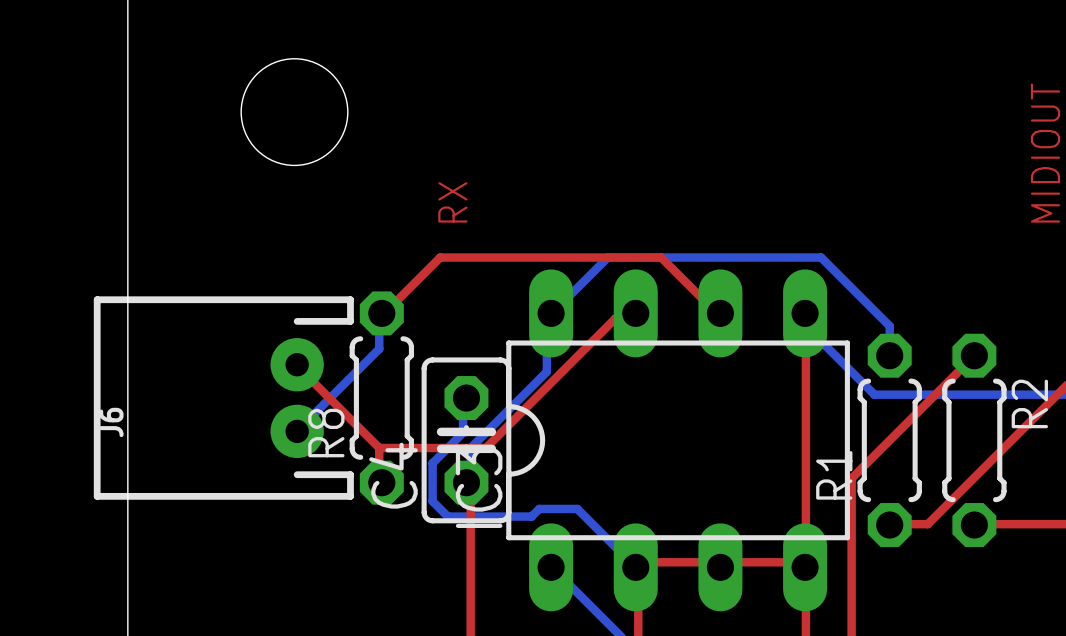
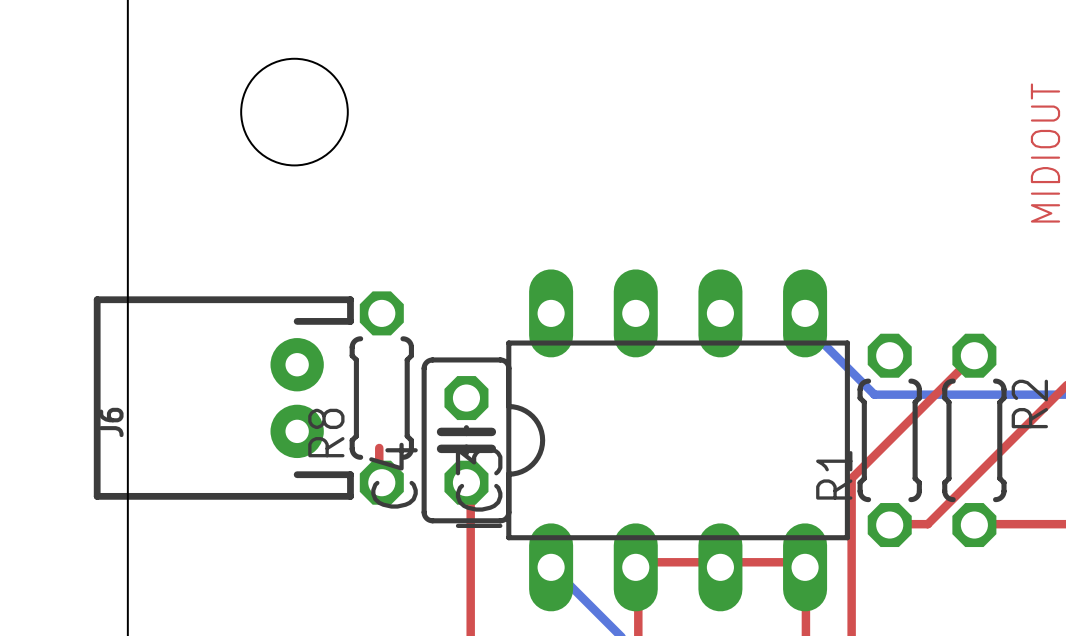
text: RX (452, 202) -> none
top track: (381, 313) (386, 310) (440, 257) (661, 257) (714, 310) (720, 313) -> none
bottom track: (381, 313) (379, 318) (379, 348) (297, 431) -> none
top track: (635, 313) (630, 318) (615, 318) (485, 447) (379, 447) (297, 364) -> none
top track: (805, 313) (805, 567) -> none
bottom track: (889, 355) (889, 326) (821, 257) (607, 257) (546, 318) (546, 371) (470, 447) (470, 478) (466, 482) -> none
bottom track: (466, 398) (463, 402) (463, 432) (432, 463) (432, 501) (447, 516) (531, 516) (539, 508) (577, 508) (635, 567) -> none

